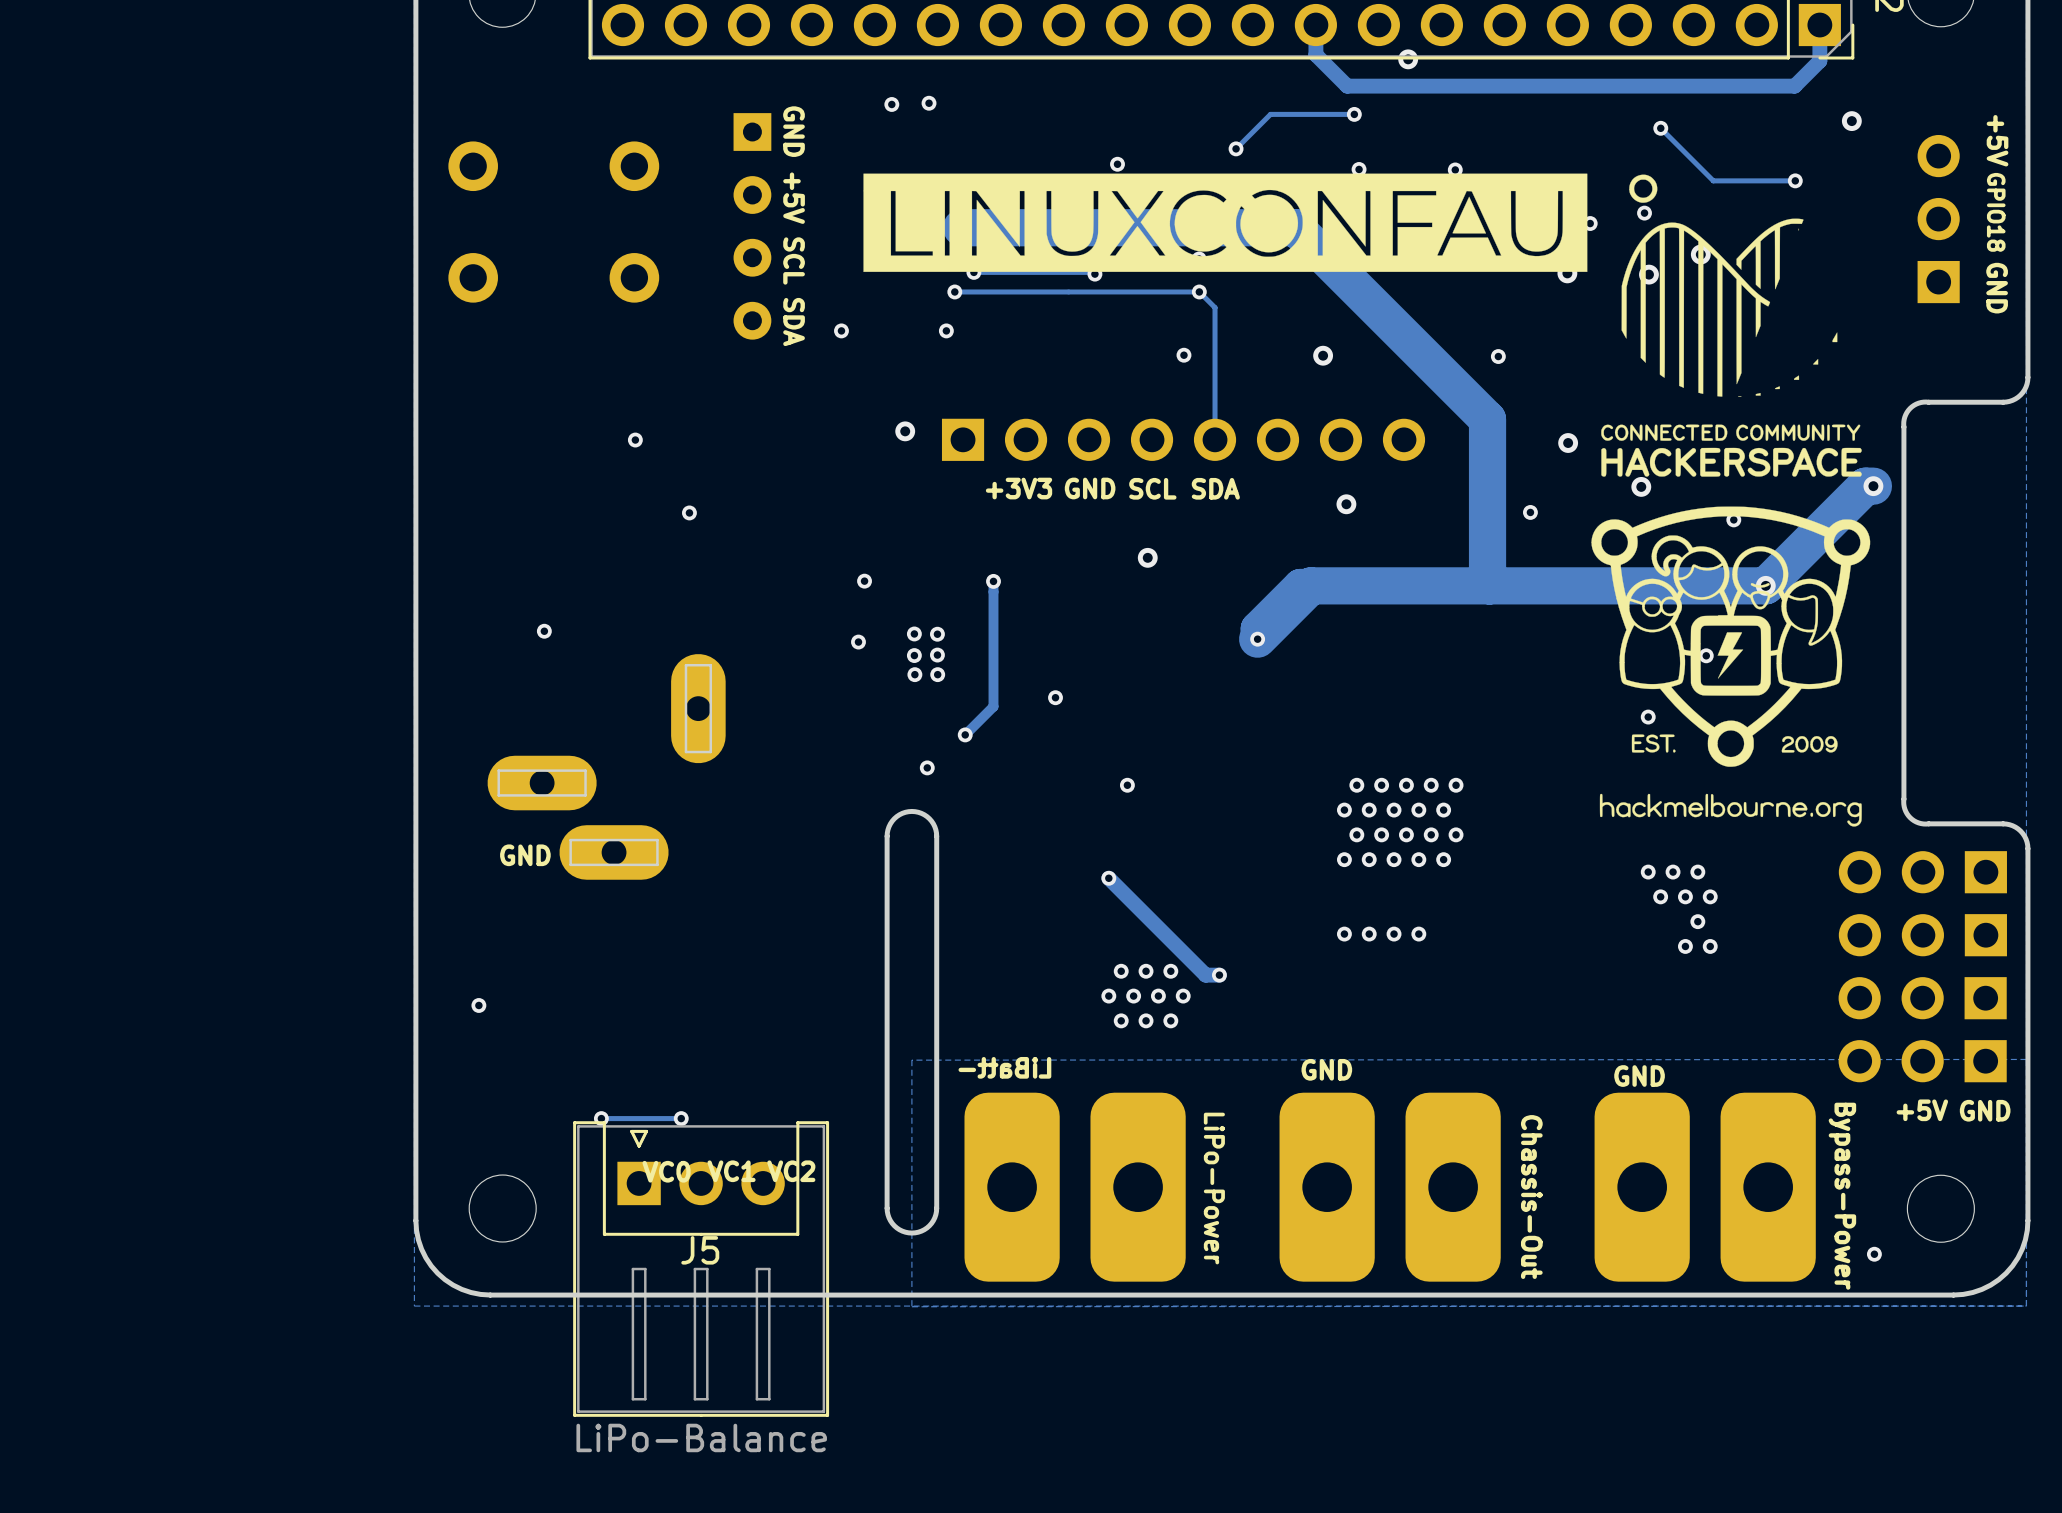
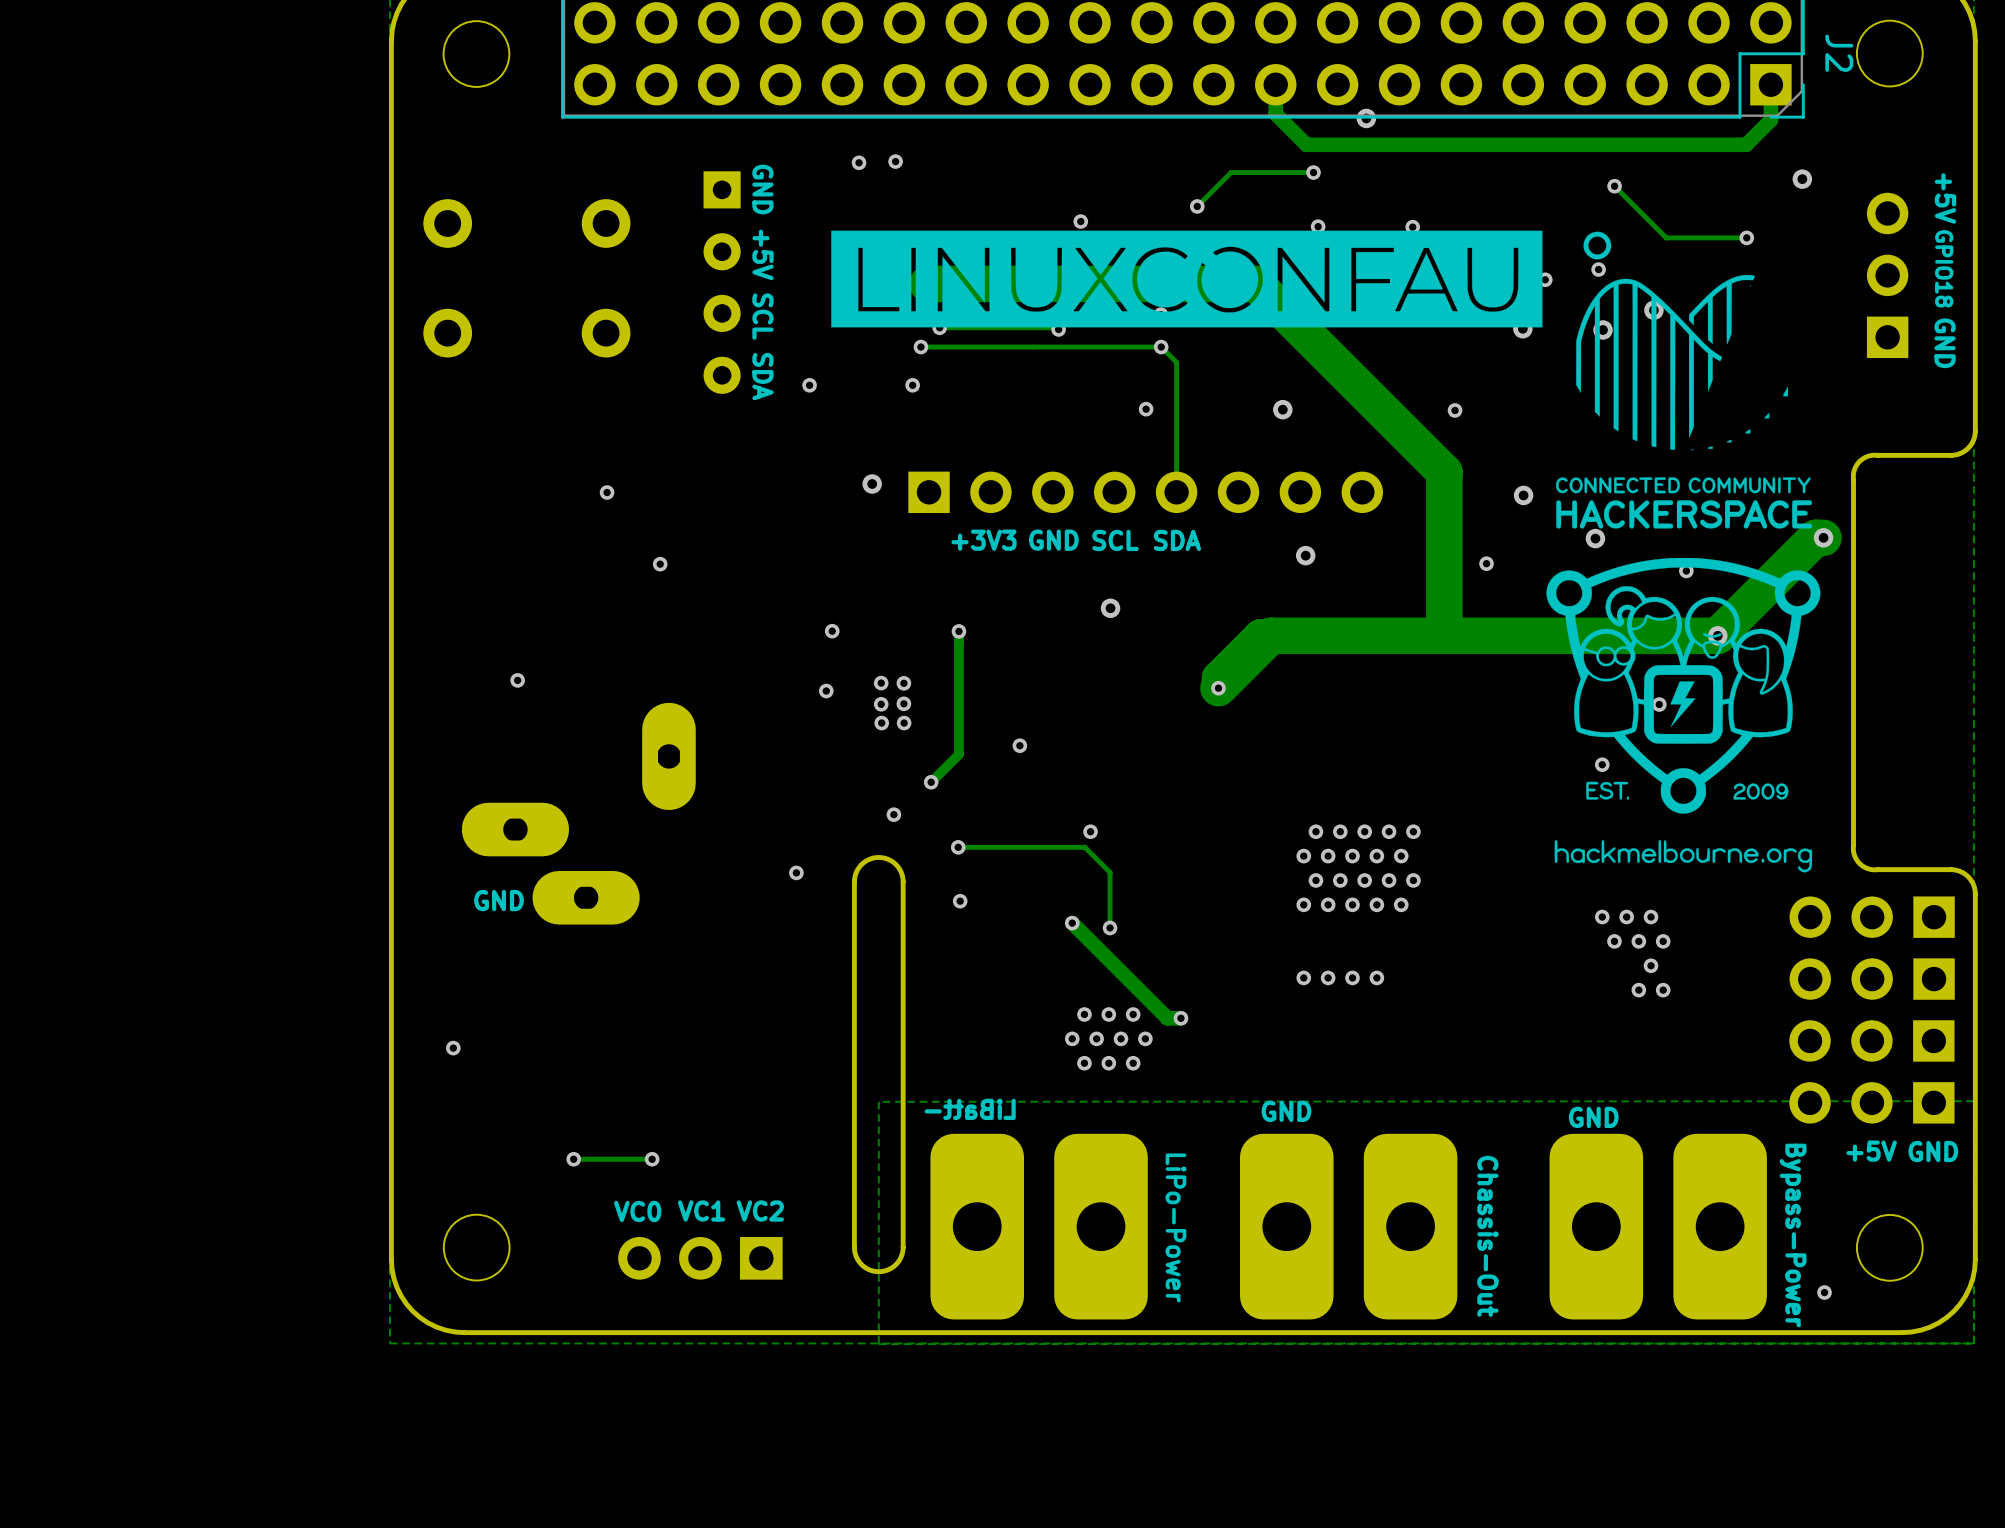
track: none -> (958, 847) (1084, 847) (1110, 872) (1110, 927)
via: none -> (958, 847)
via: none -> (796, 872)
via: none -> (960, 901)
via: none -> (1110, 927)
J5 side: bottom (701, 1269) -> top (700, 1258)

